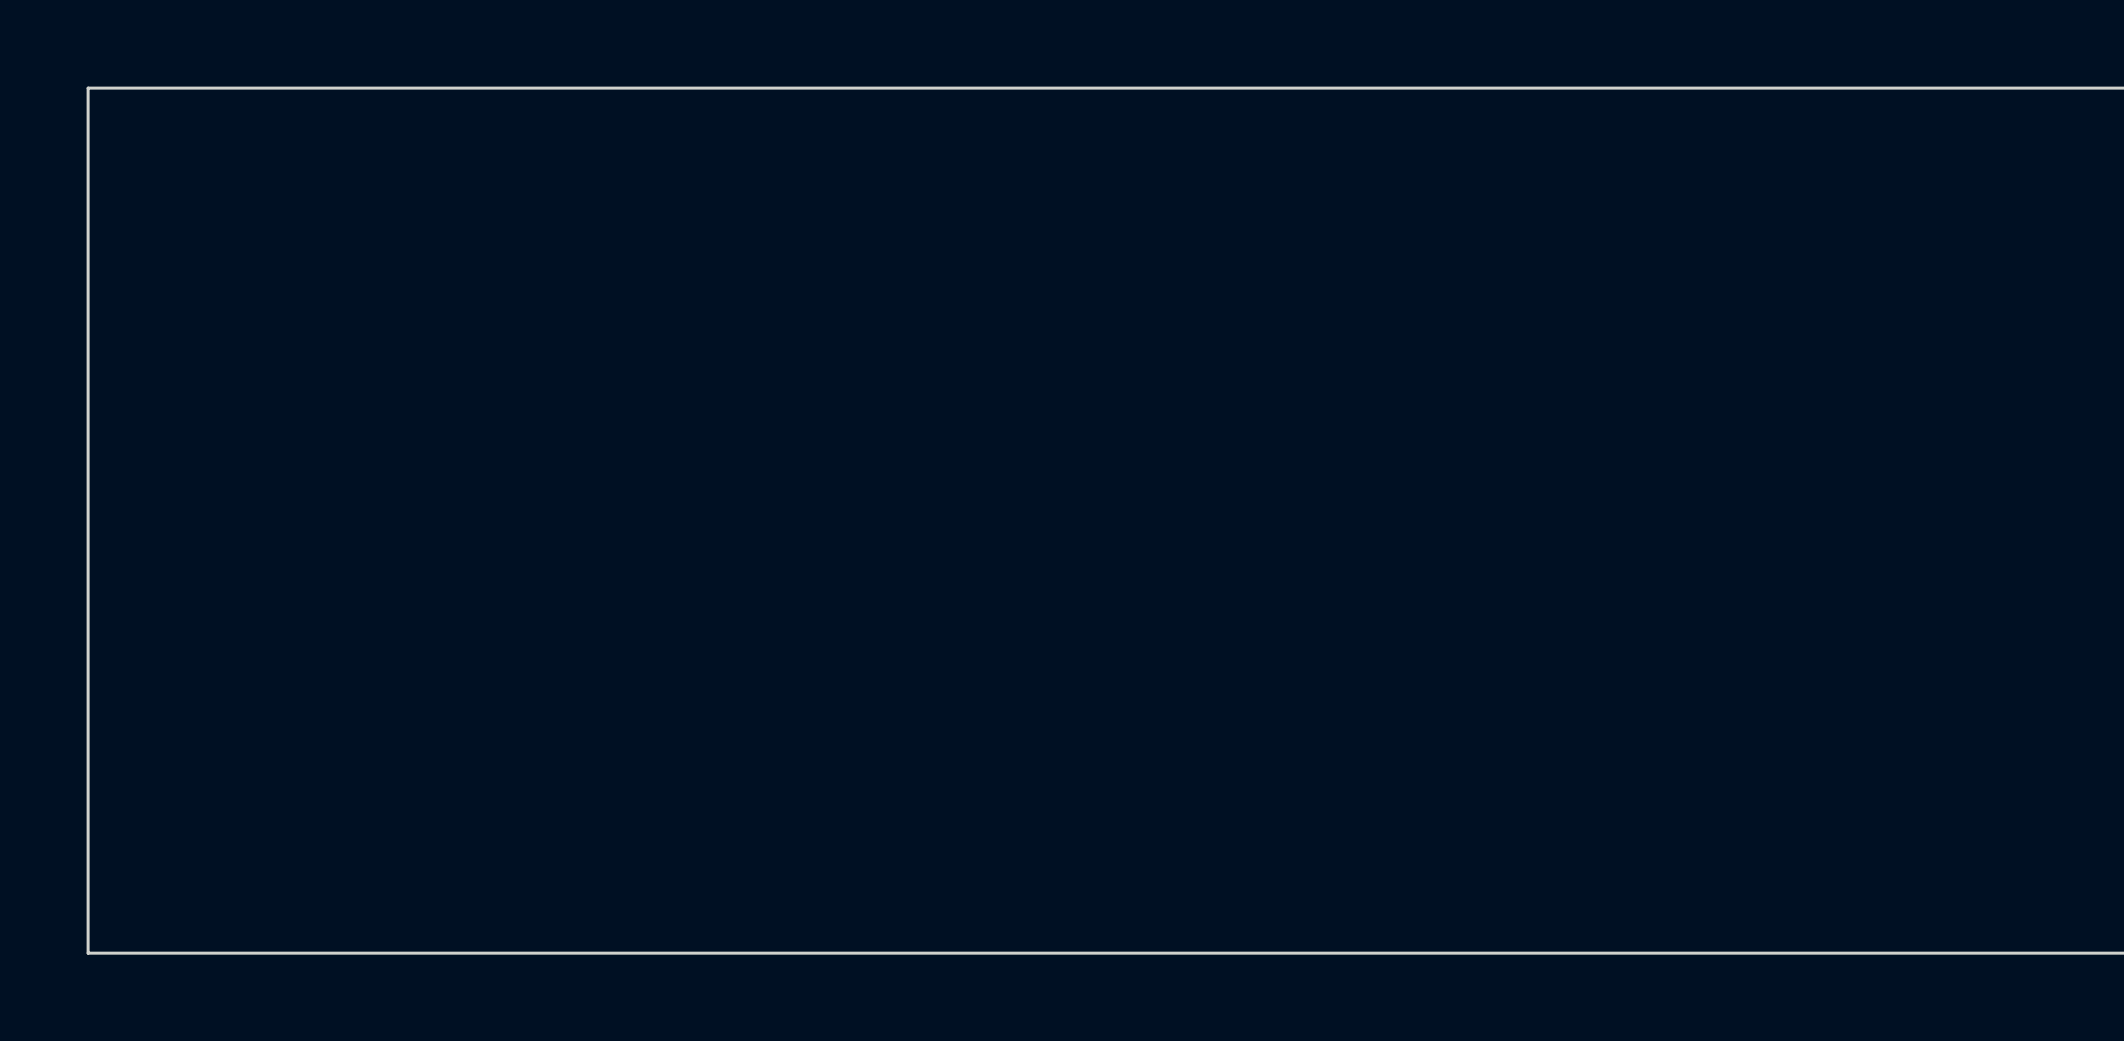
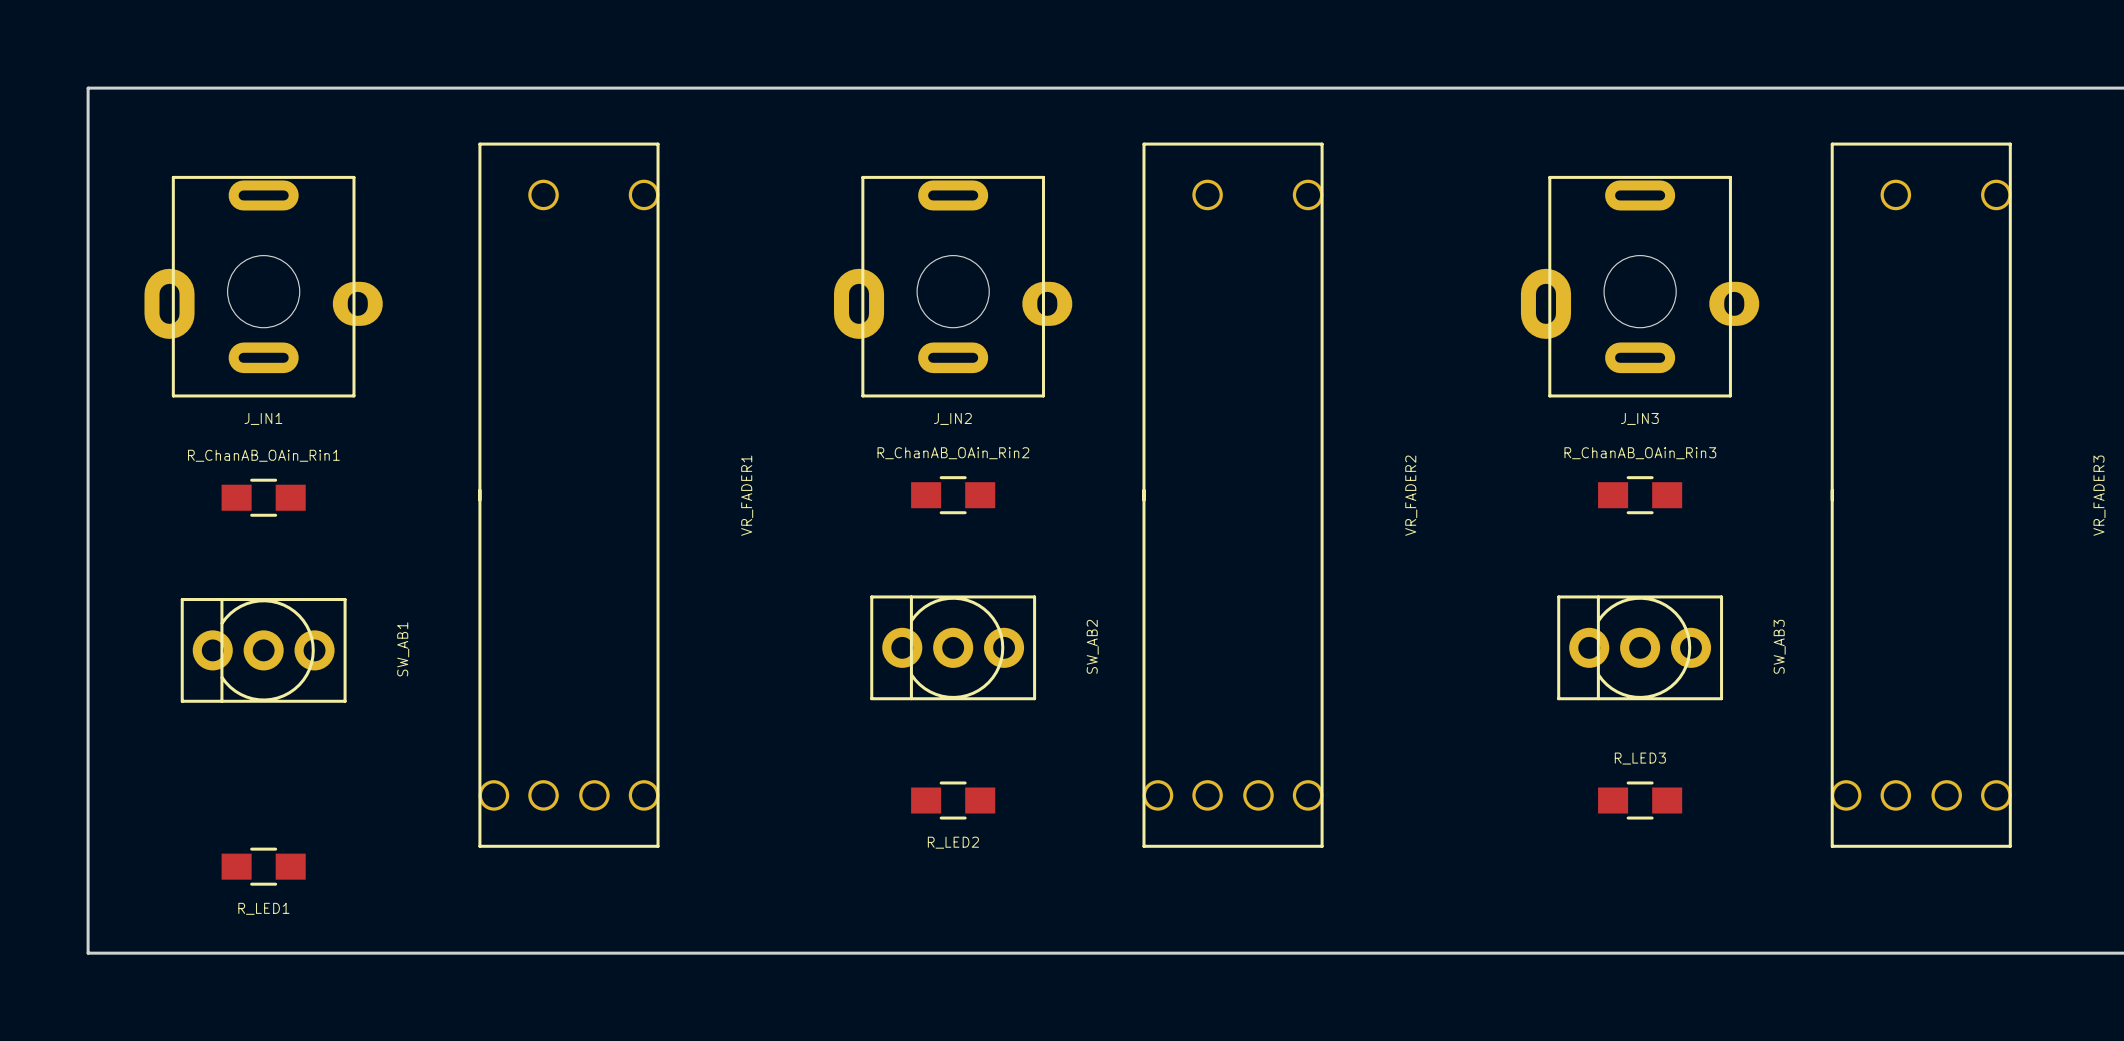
J_IN1: none -> (263, 286)
J_IN2: none -> (953, 286)
J_IN3: none -> (1640, 286)
VR_FADER1: none -> (568, 495)
R_ChanAB_OAin_Rin2: none -> (953, 495)
VR_FADER2: none -> (1233, 495)
R_ChanAB_OAin_Rin3: none -> (1640, 495)
VR_FADER3: none -> (1921, 495)
R_ChanAB_OAin_Rin1: none -> (263, 497)
SW_AB2: none -> (953, 647)
SW_AB3: none -> (1640, 647)
SW_AB1: none -> (263, 650)
R_LED2: none -> (953, 800)
R_LED3: none -> (1640, 800)
R_LED1: none -> (263, 866)

